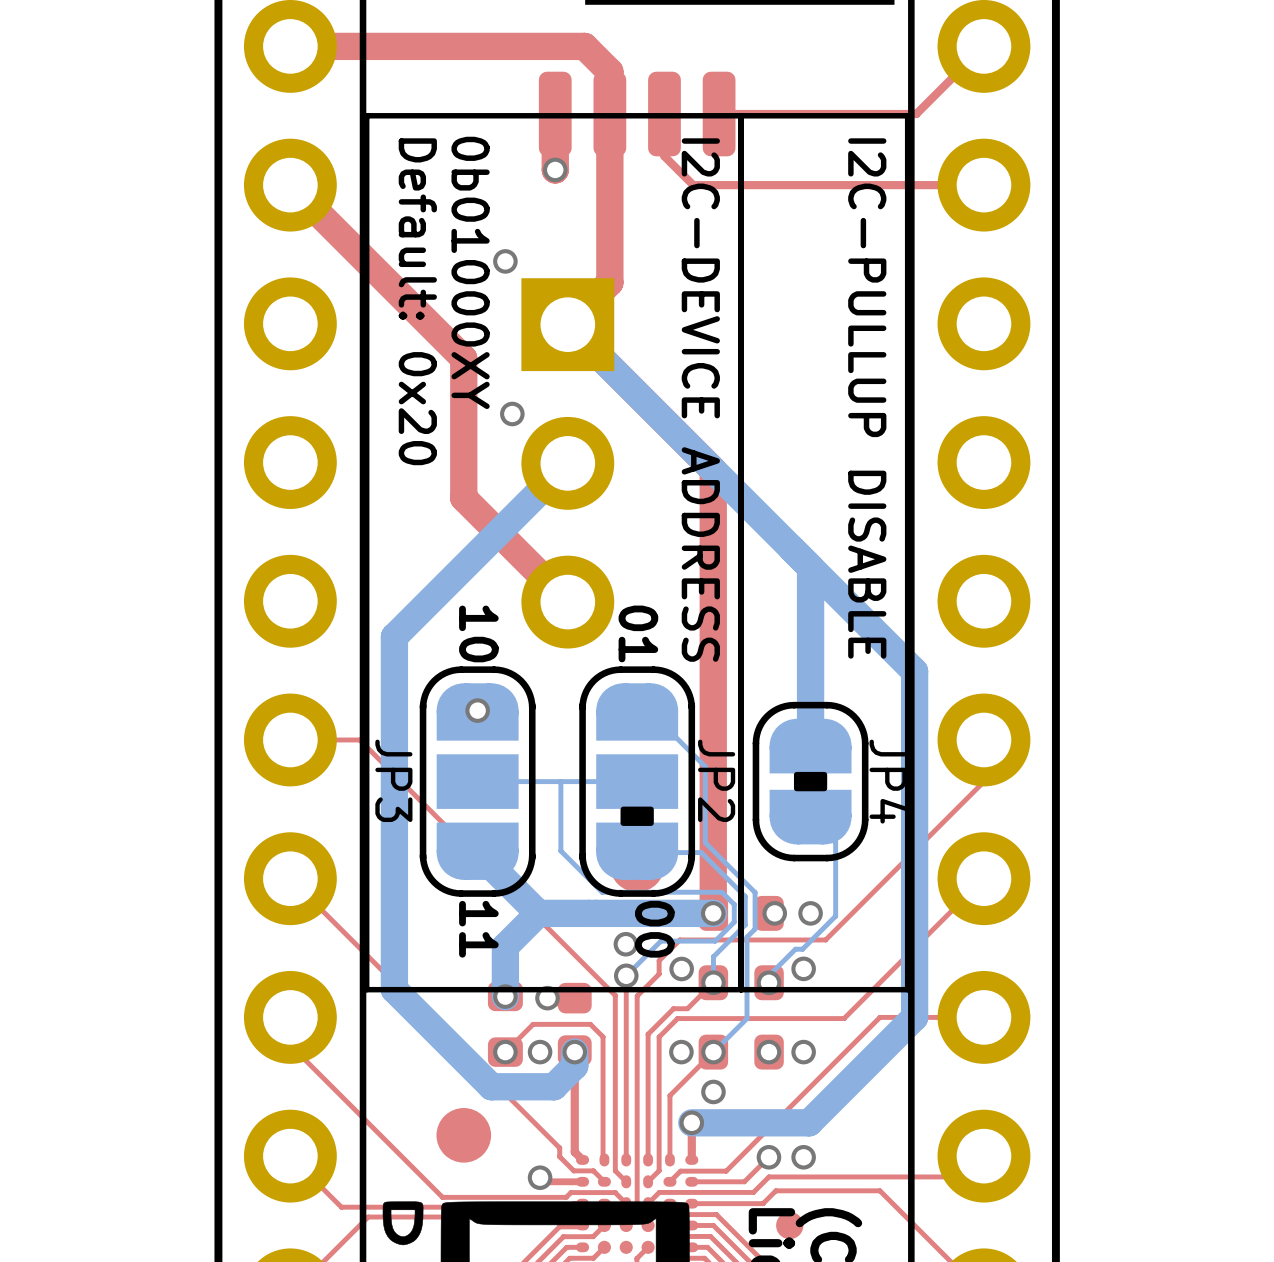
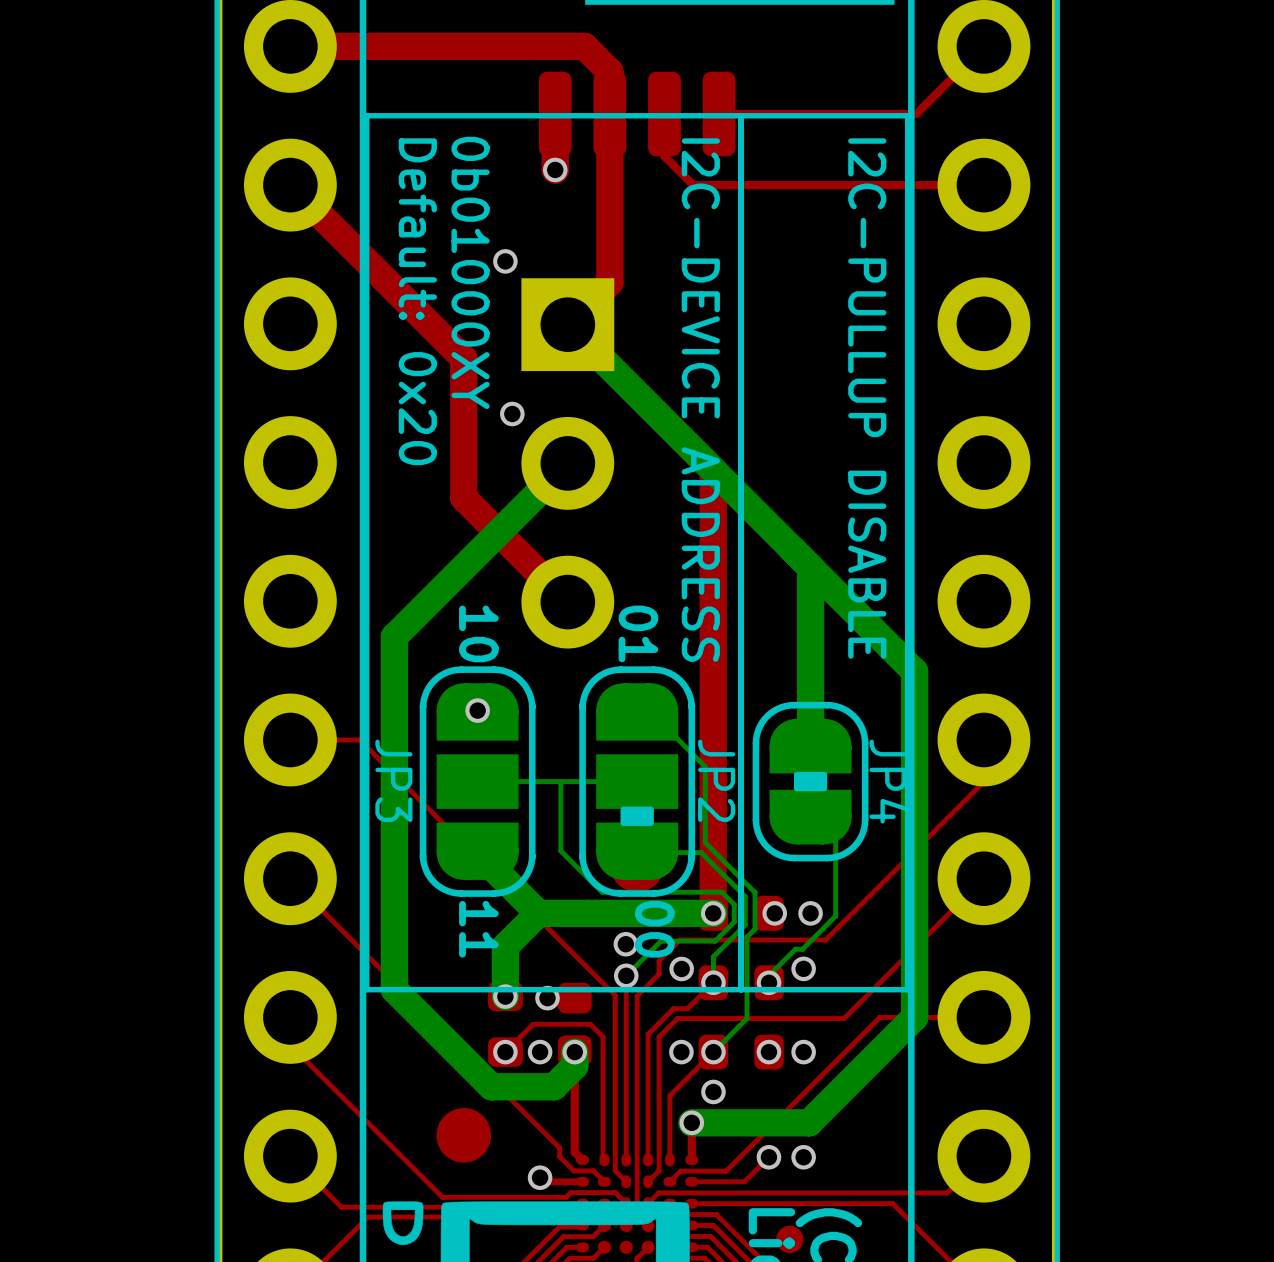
top track: (963, 1176) (768, 1176) (753, 1192) (659, 1192) -> (963, 1176) (947, 1193) (658, 1193)
top track: (892, 1203) (879, 1190) (775, 1190) (763, 1203) -> (892, 1203) (763, 1203)
part position: (789, 1225) -> (789, 1239)

